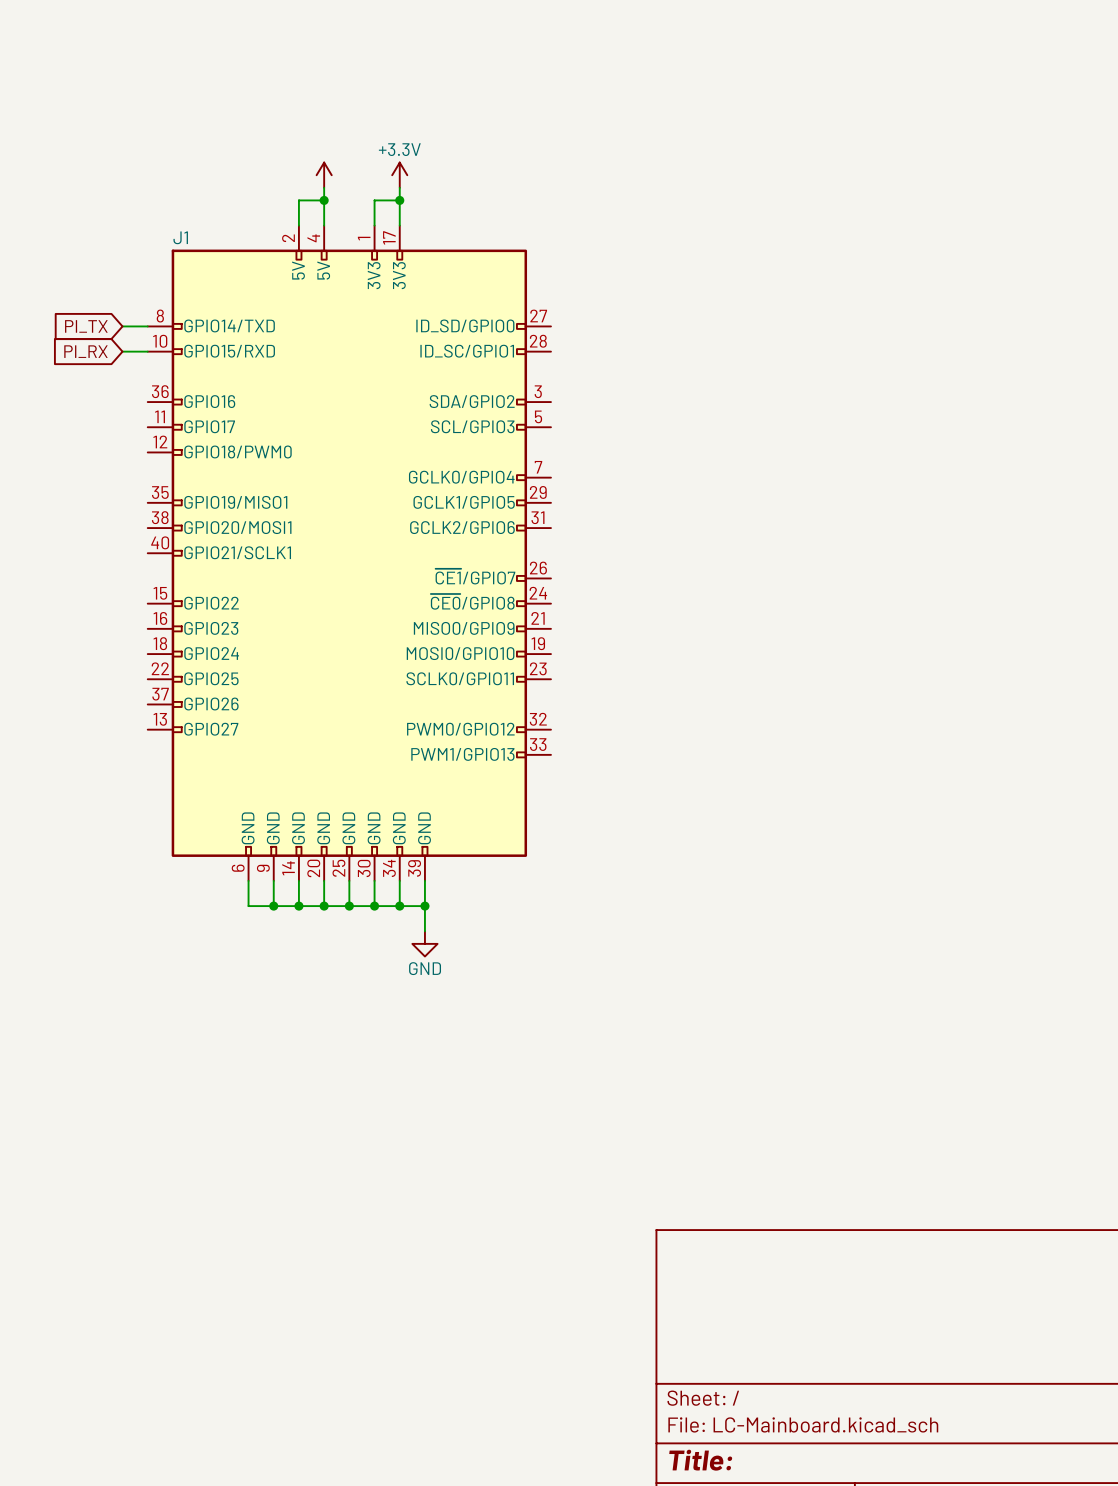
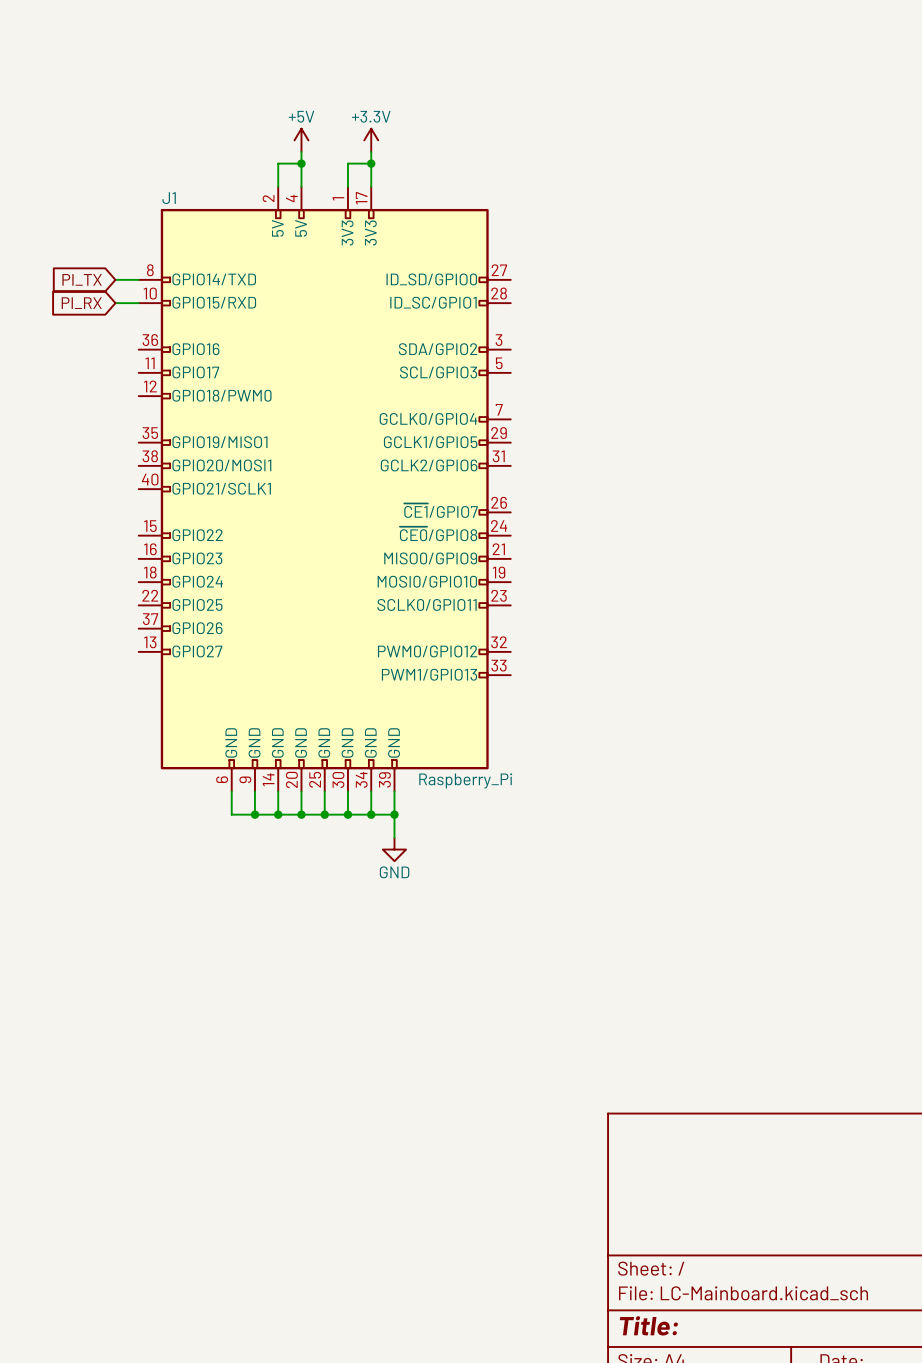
power symbol text: none -> +5V (301, 116)
J1 value: none -> Raspberry_Pi (465, 780)

